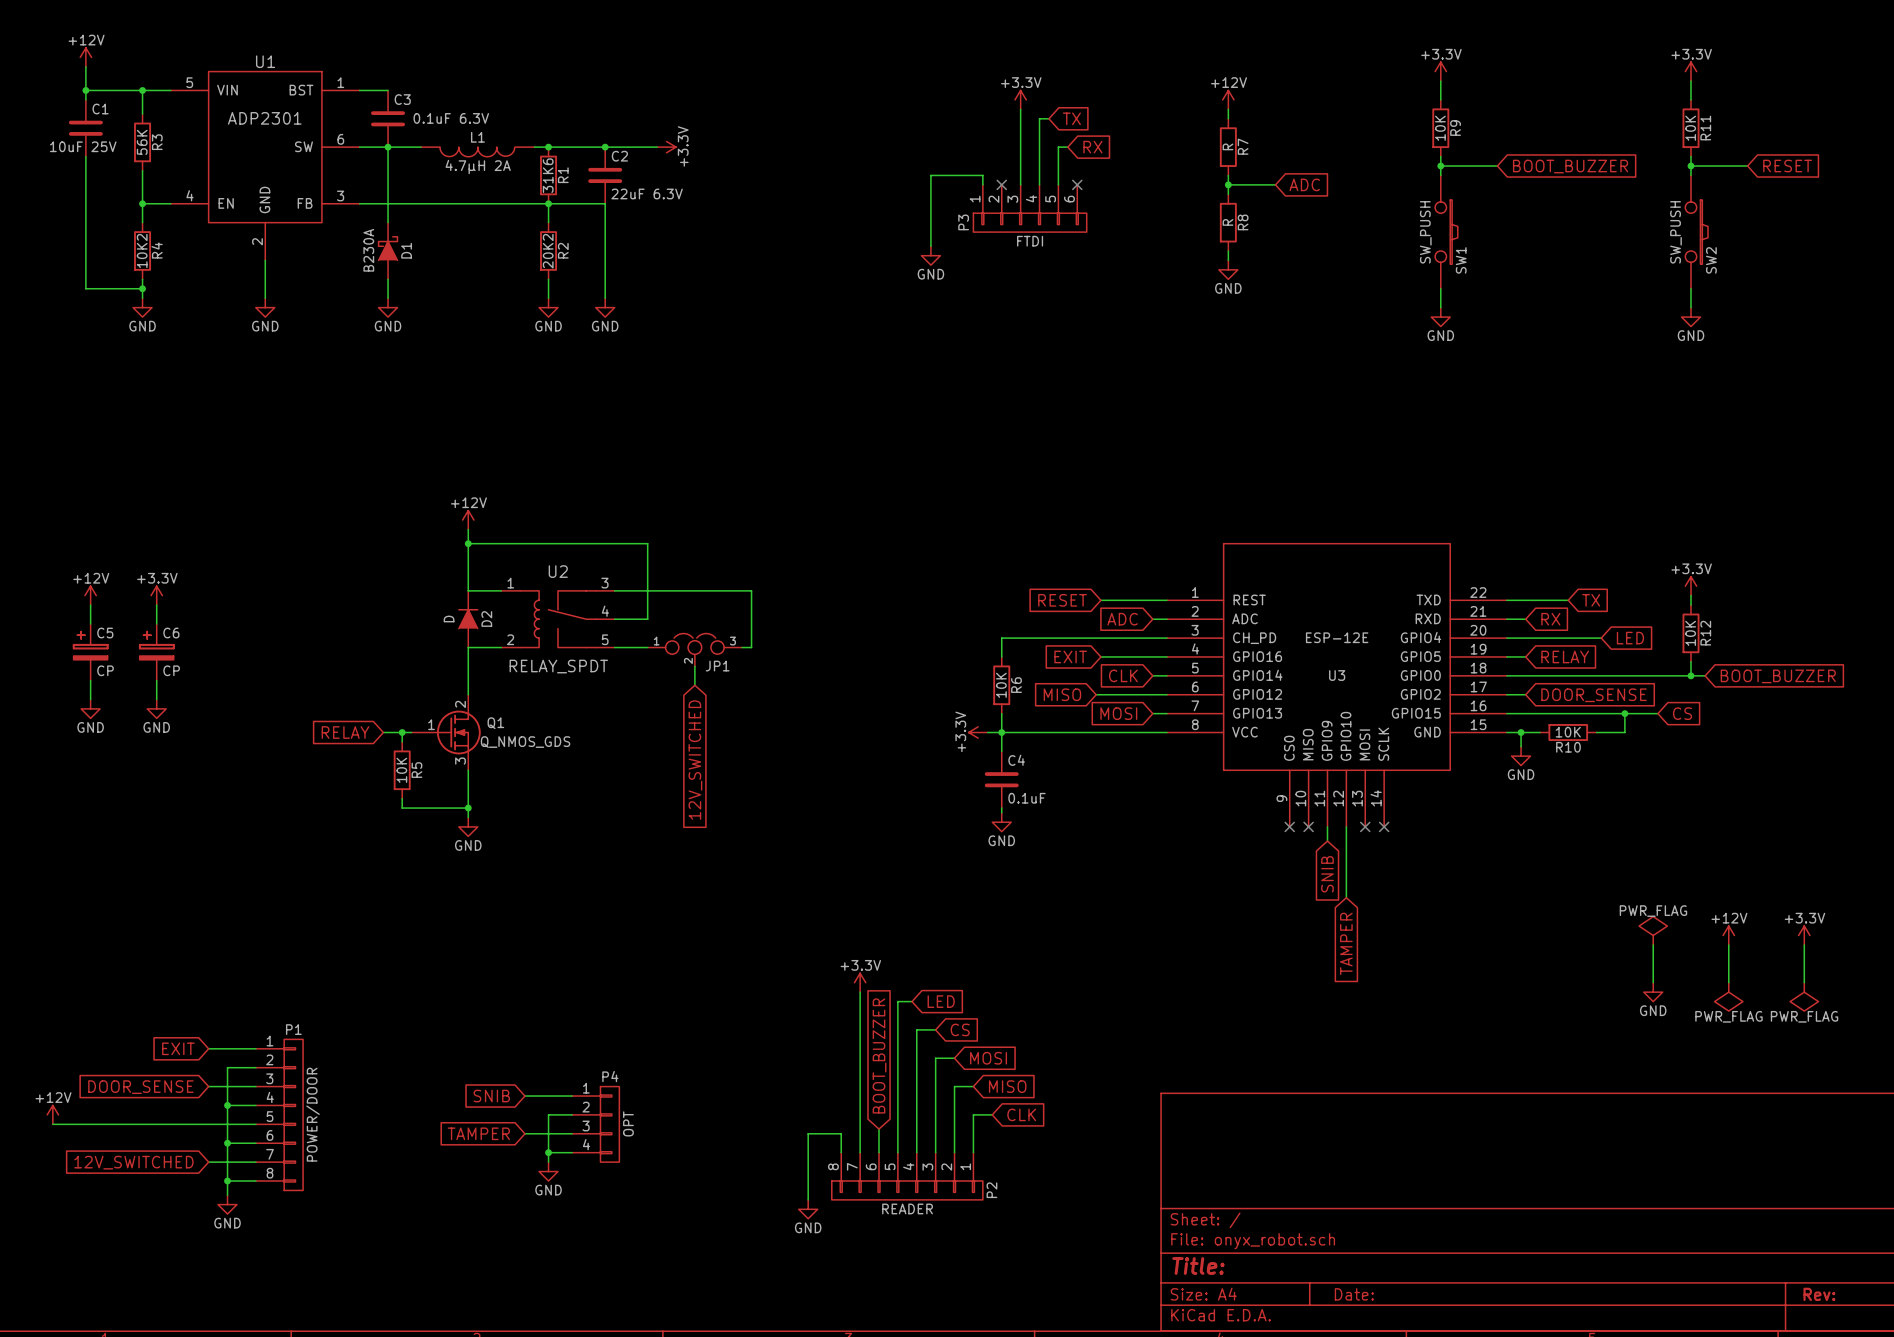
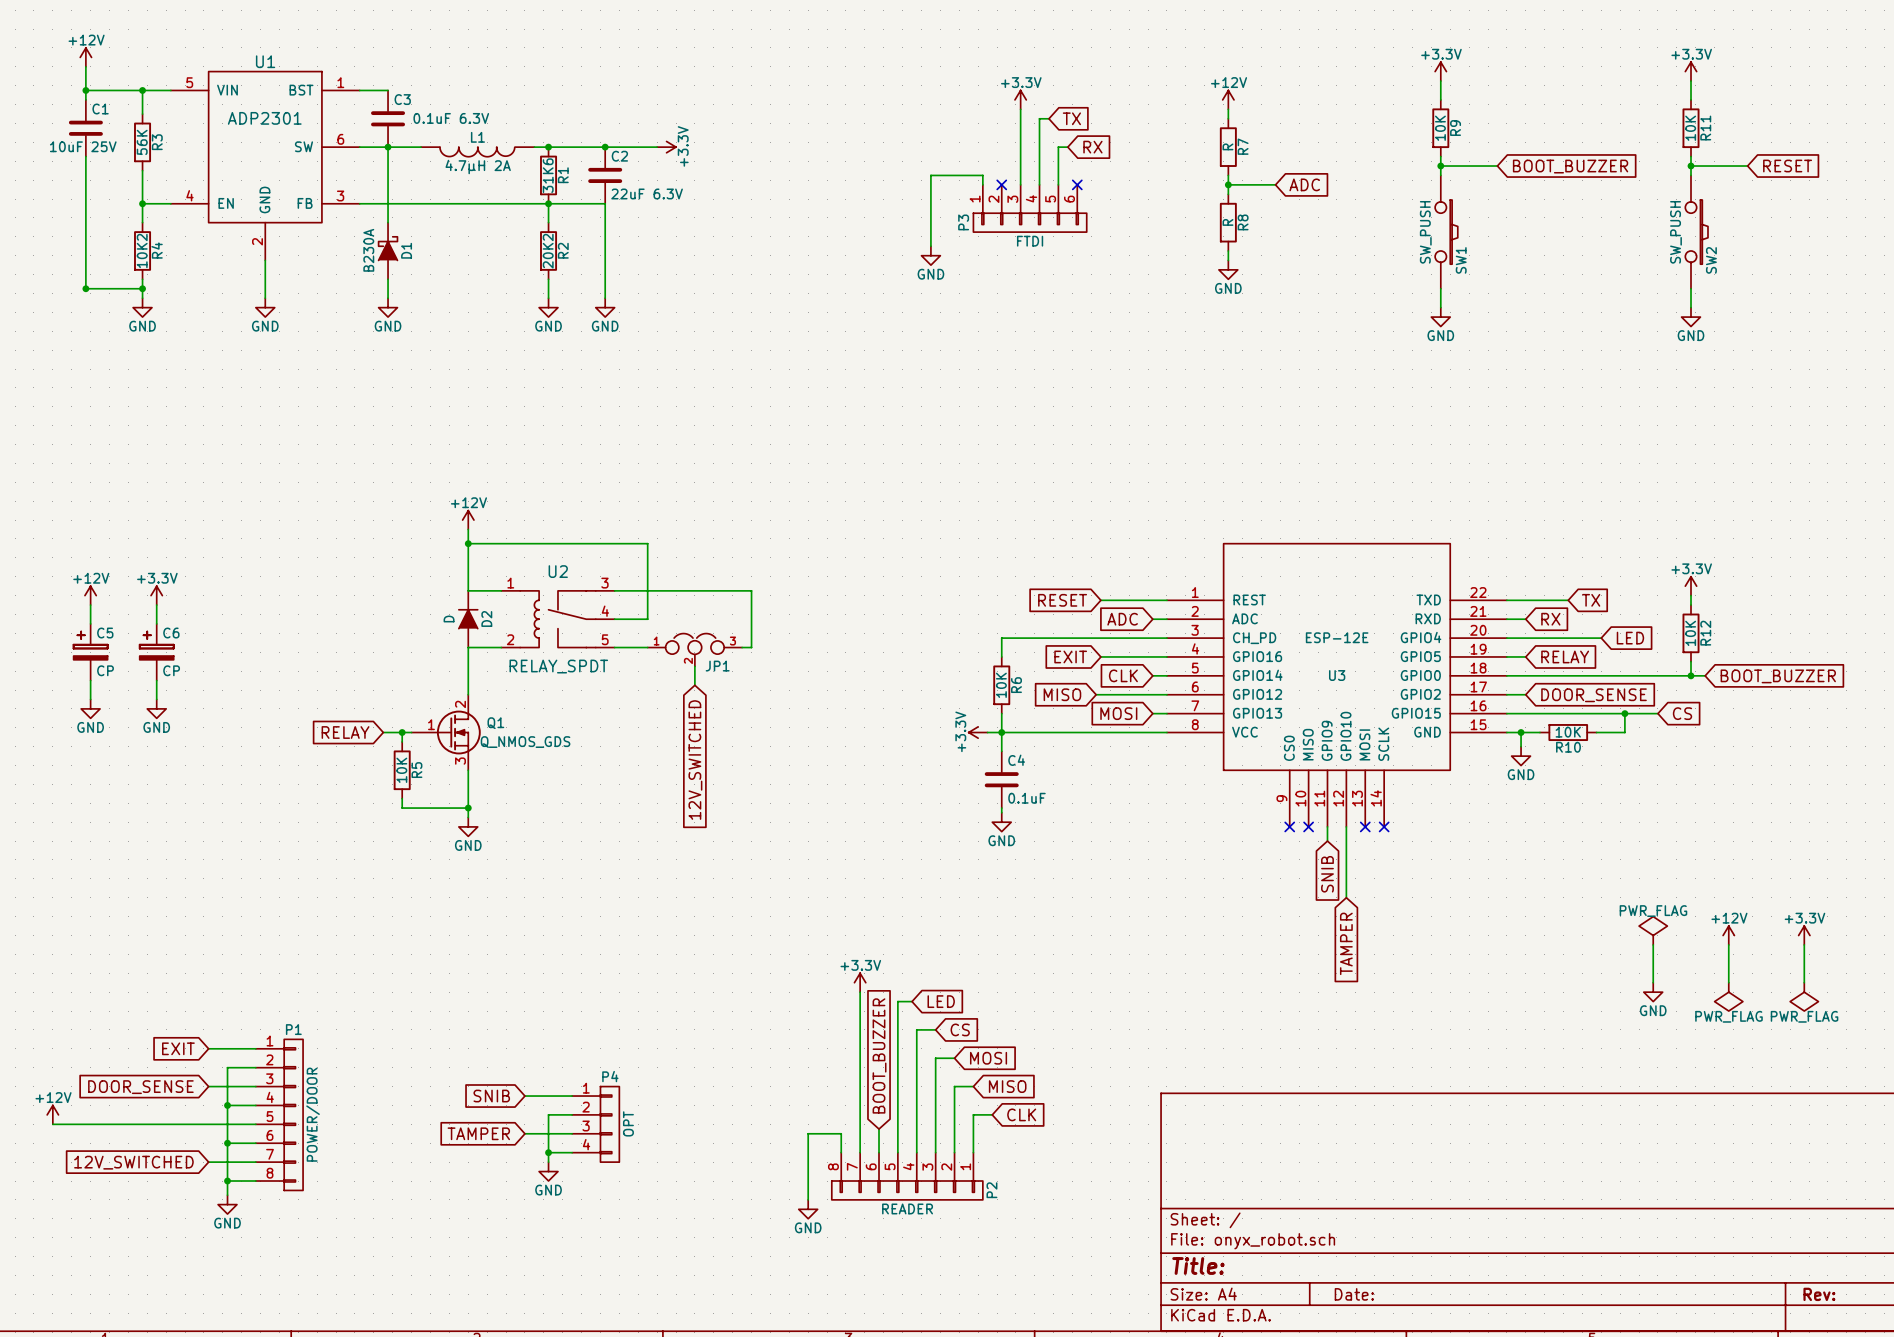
junction: none -> (85, 288)

